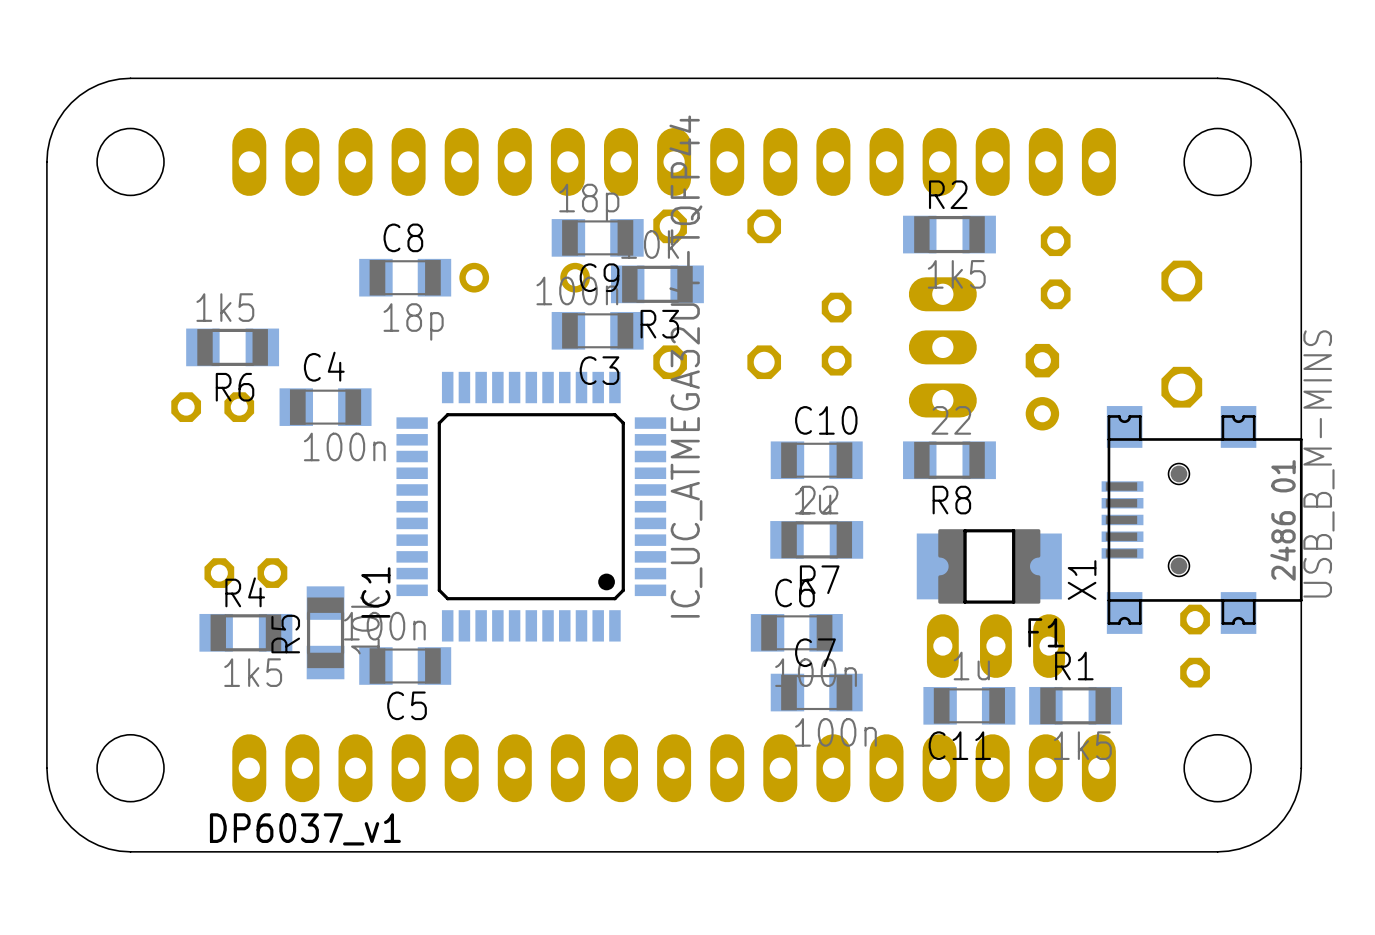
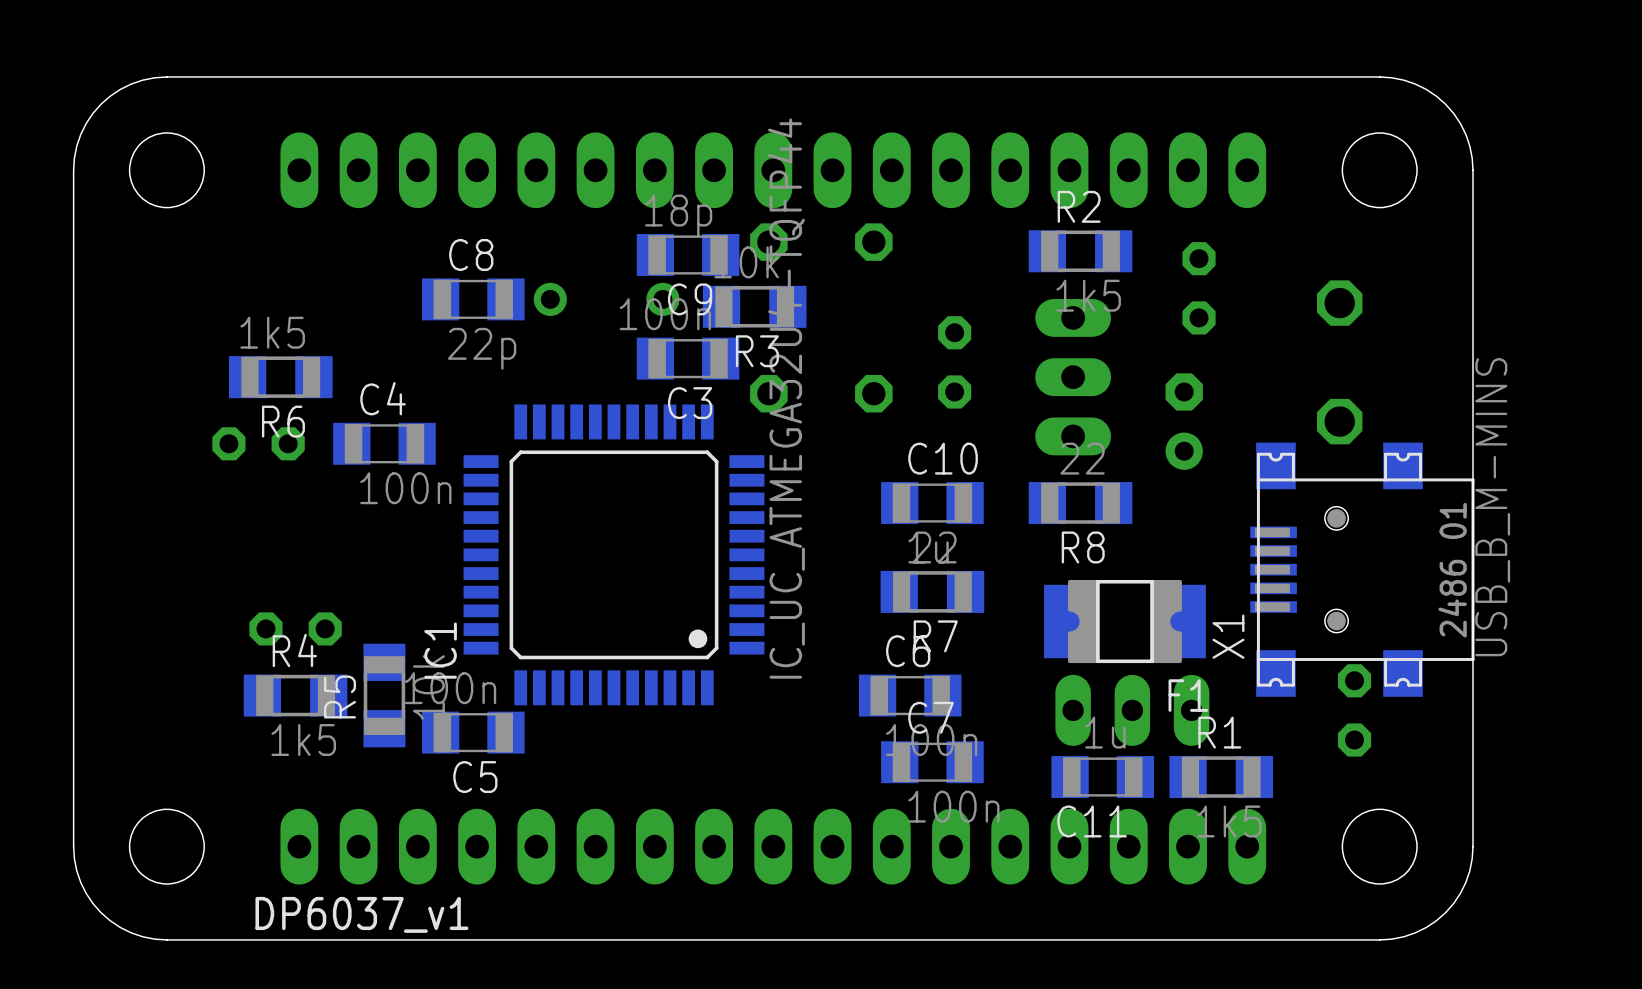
C8 value: 18p (413, 321) -> 22p (482, 348)

